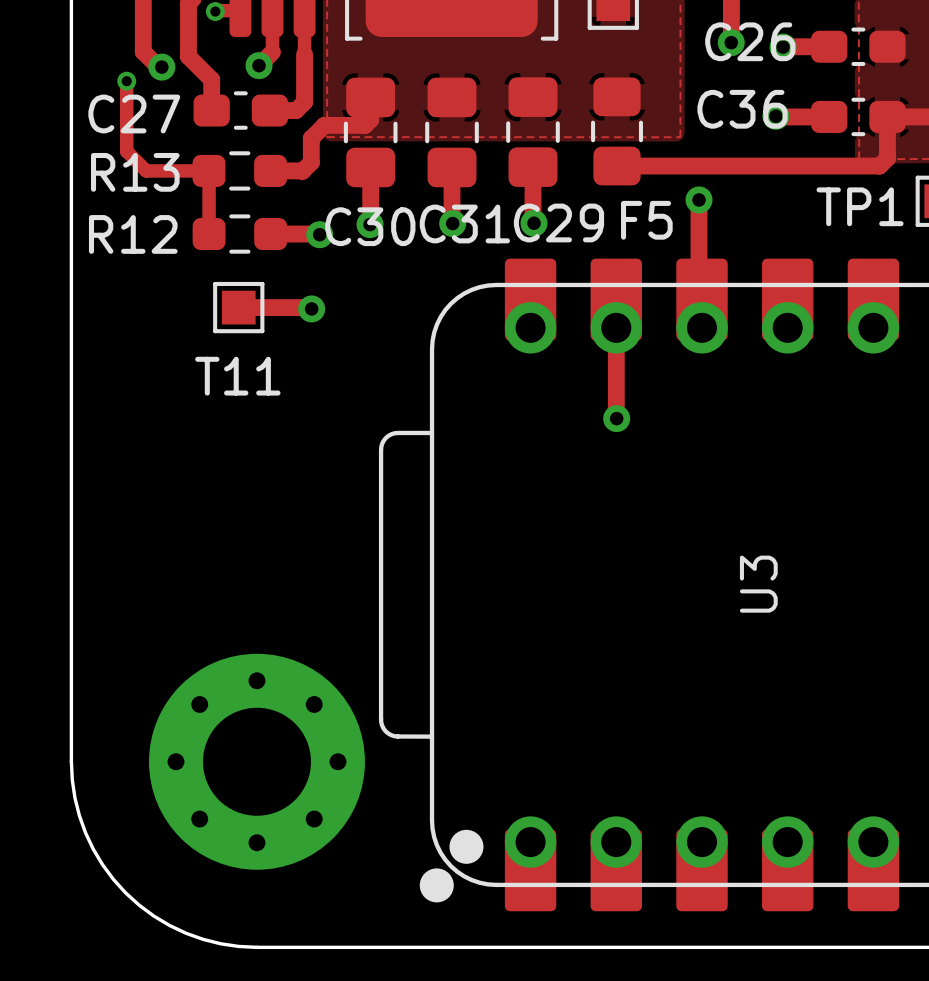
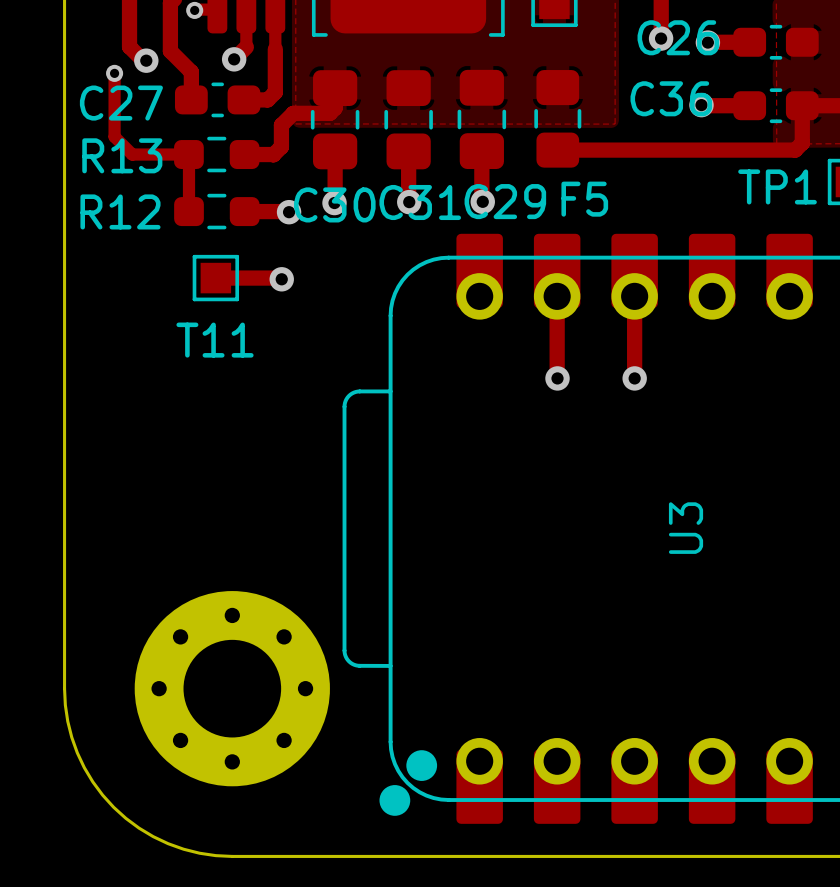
track: (699, 199) (699, 296) -> none
via: (699, 199) -> none
track: none -> (634, 296) (634, 378)
via: none -> (634, 378)

